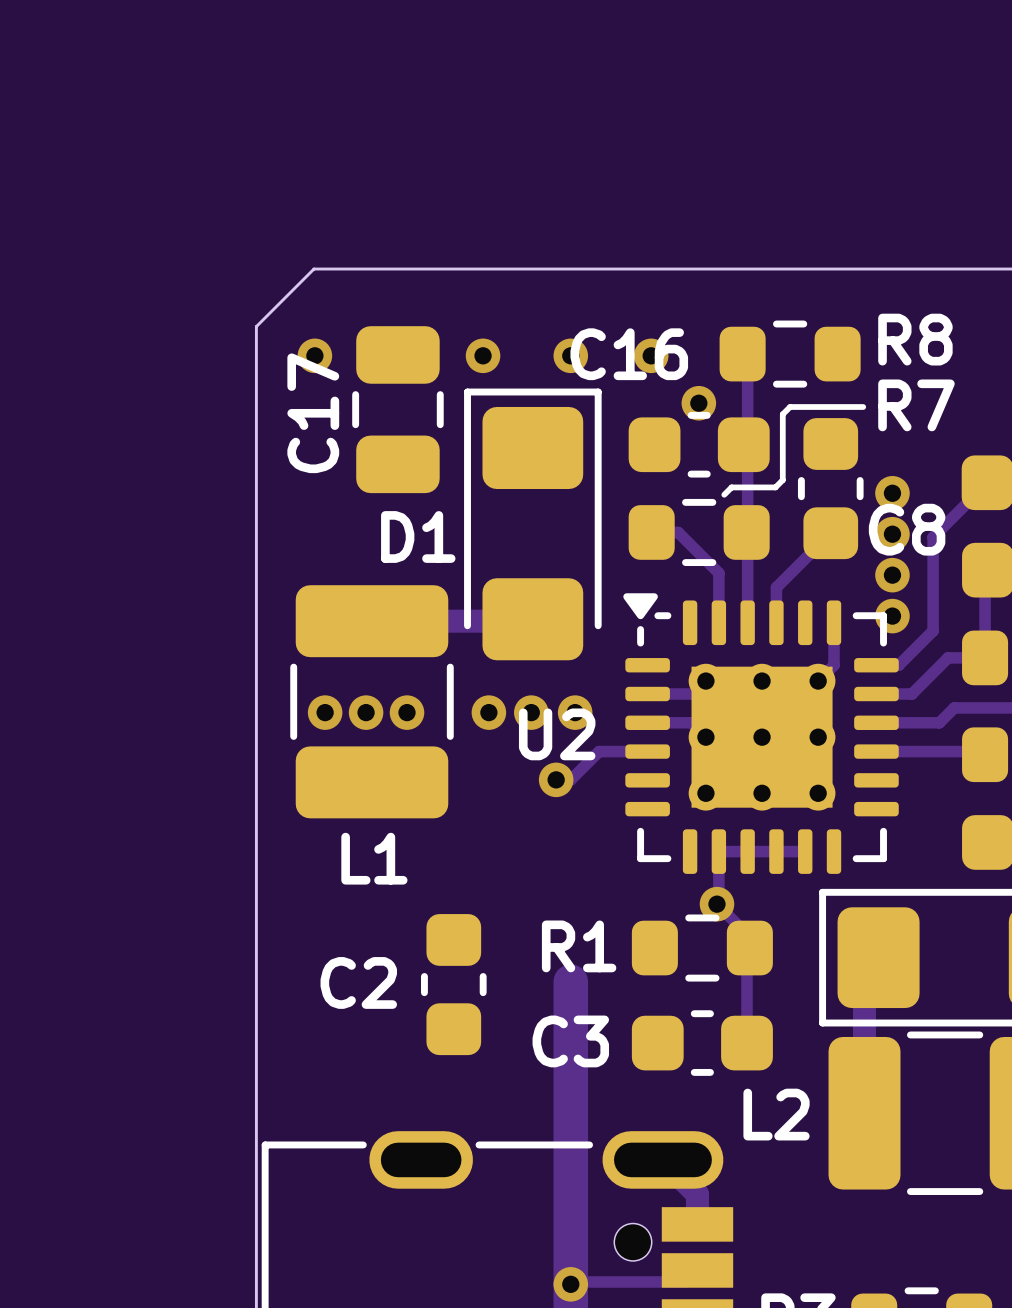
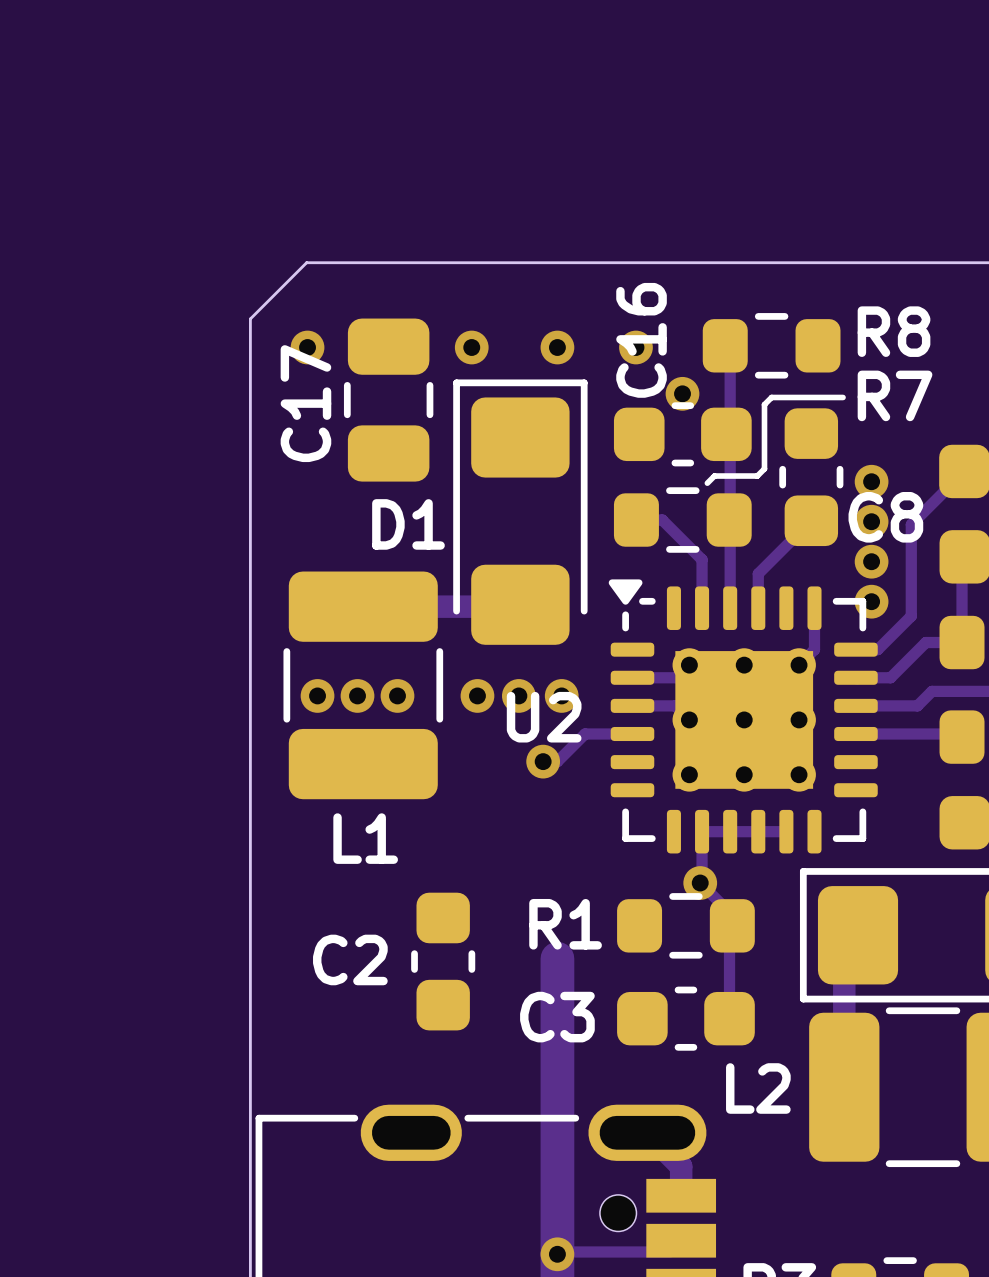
C16 name rotation: 0° (629, 354) -> 90° counterclockwise (641, 340)

